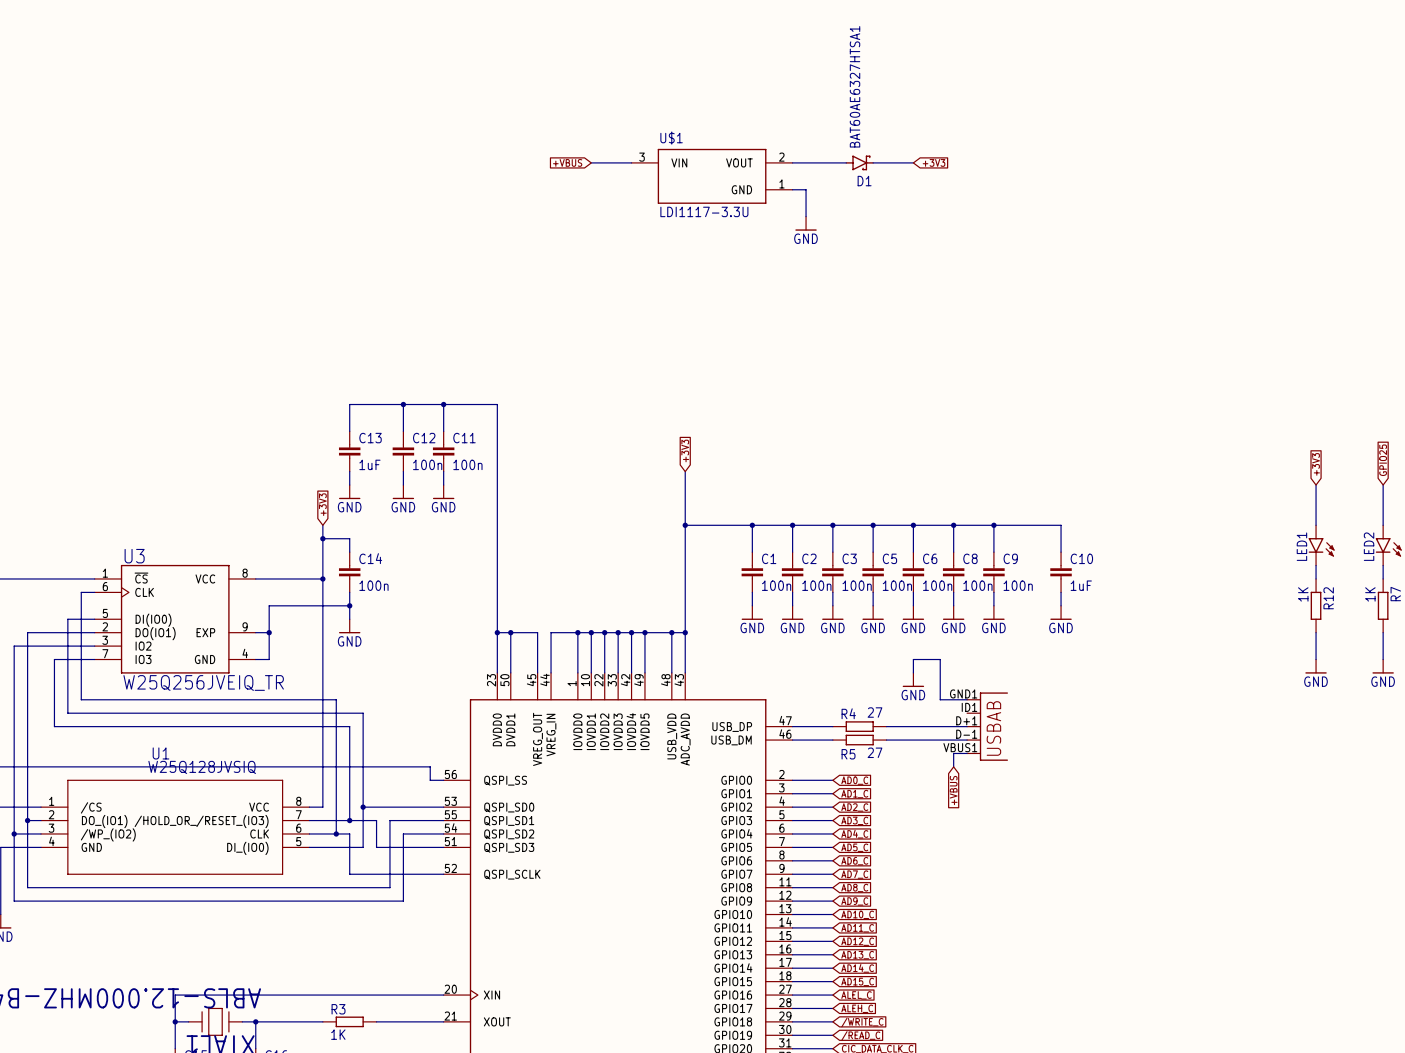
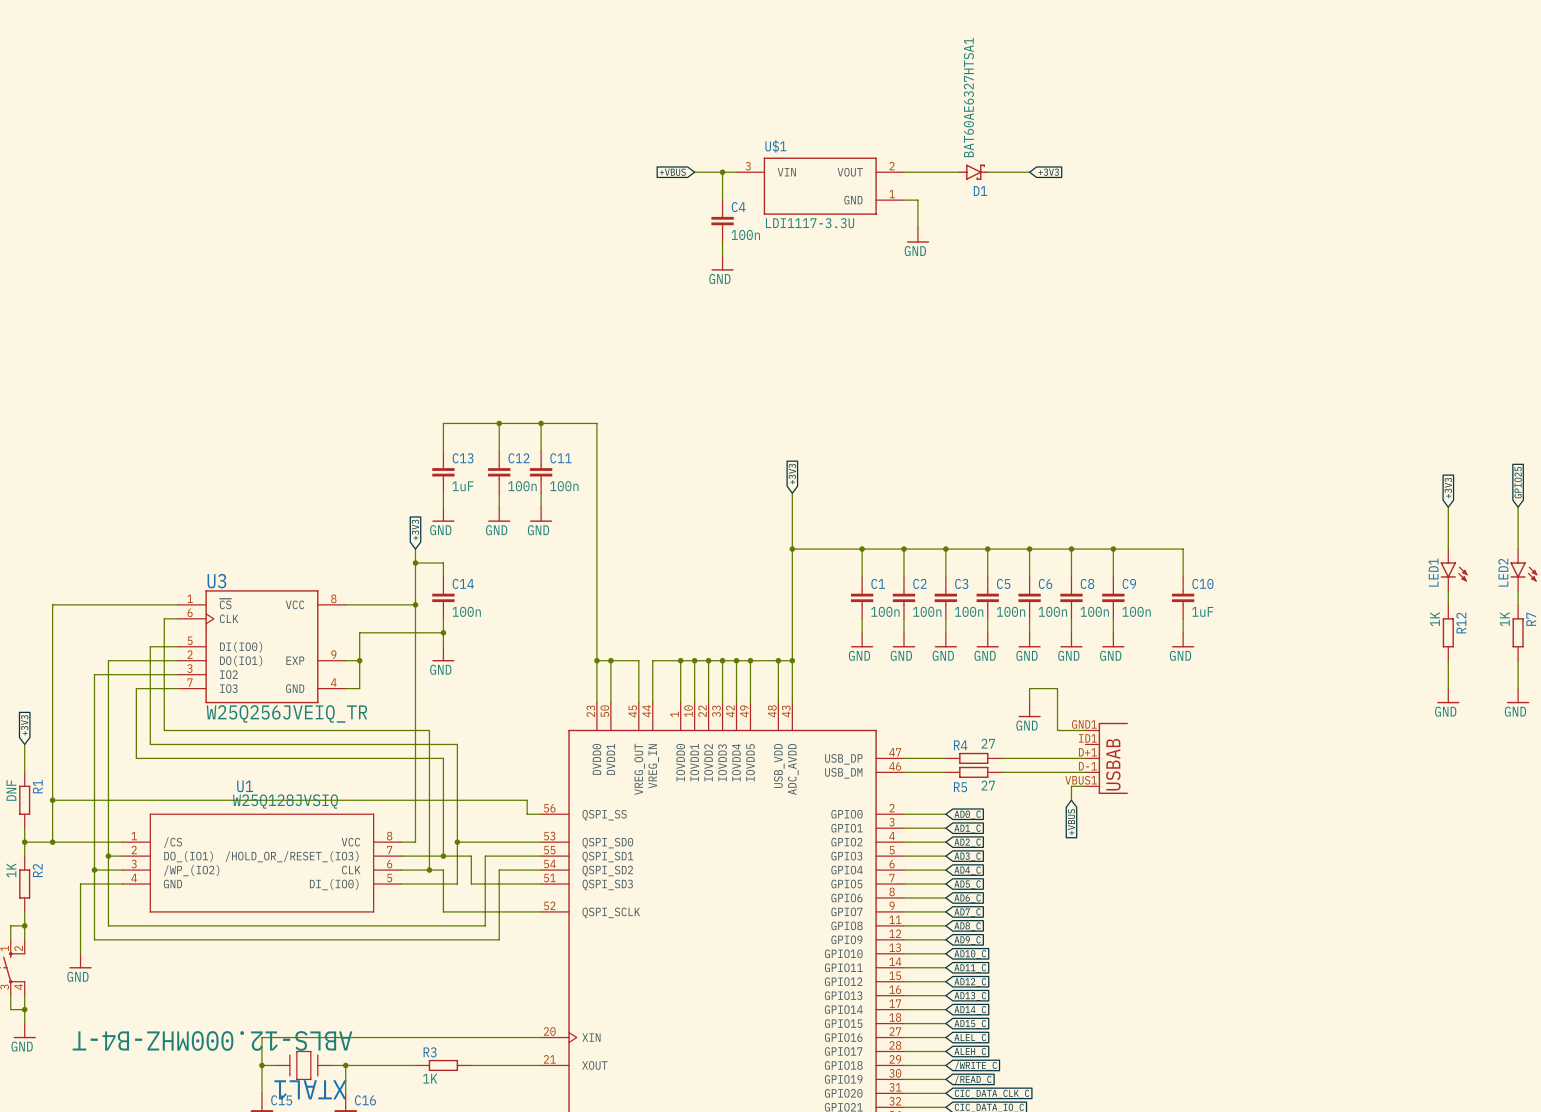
wire: none -> (722, 172) (722, 200)
junction: none -> (722, 172)
C4: none -> 100n (722, 221)
wire: none -> (722, 242) (722, 255)
power symbol: none -> GND (722, 263)

